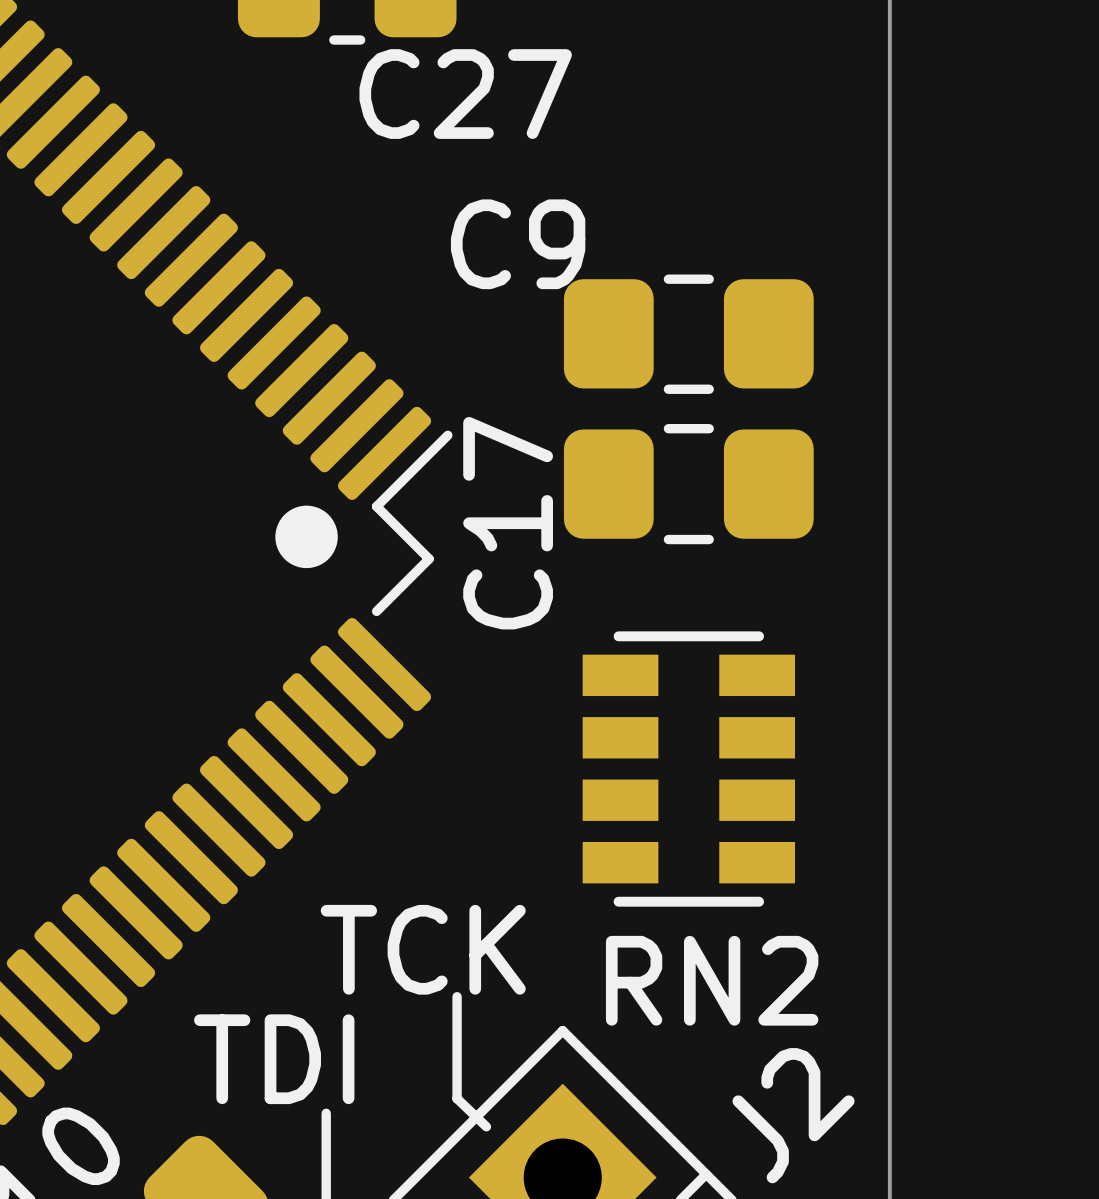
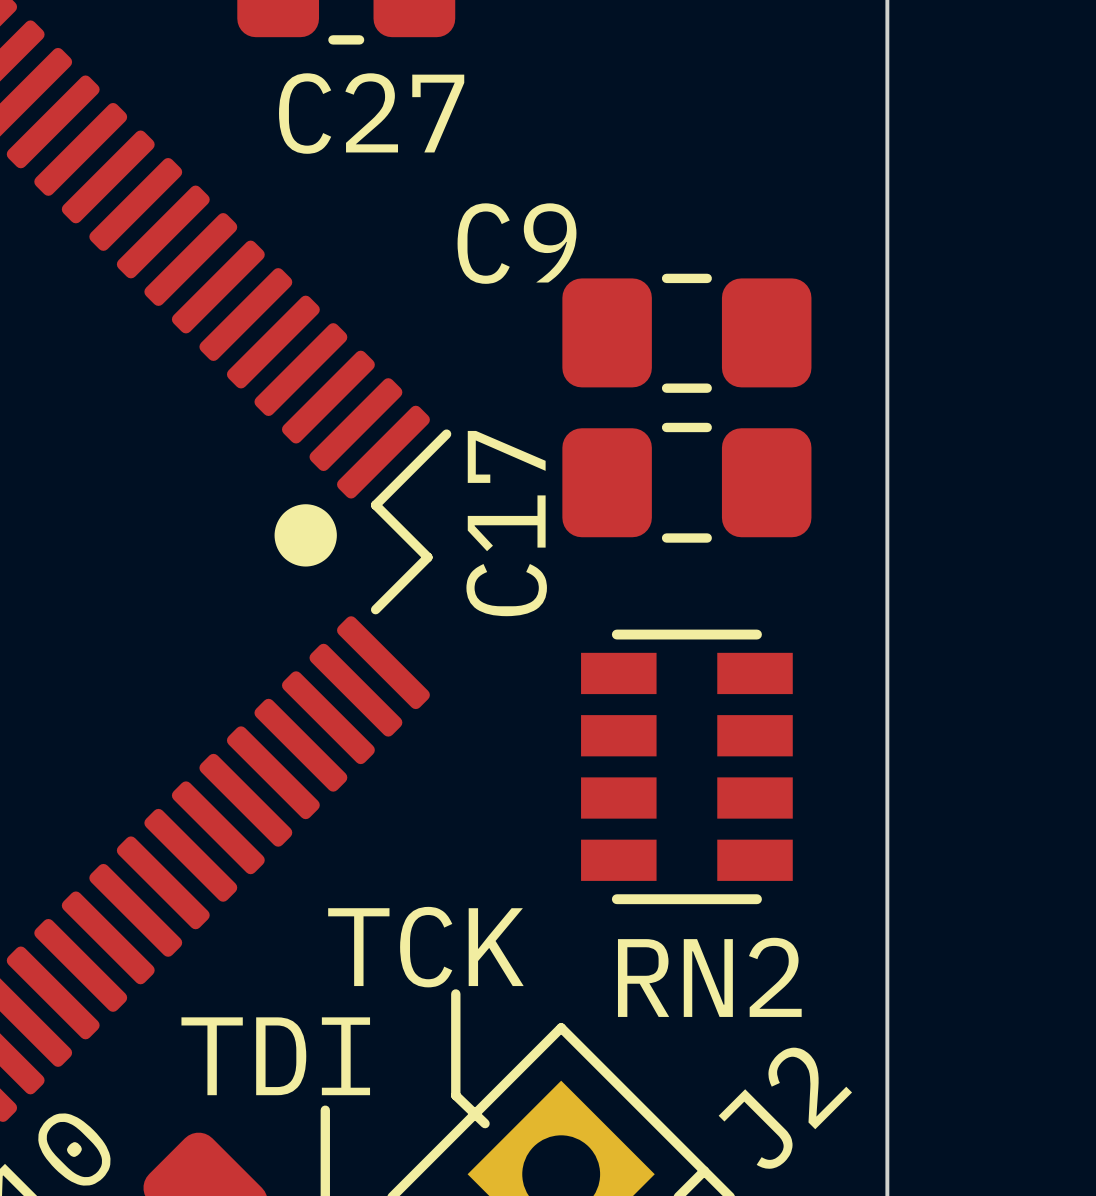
C27 name position: C27 (465, 94) -> C27 (371, 113)

